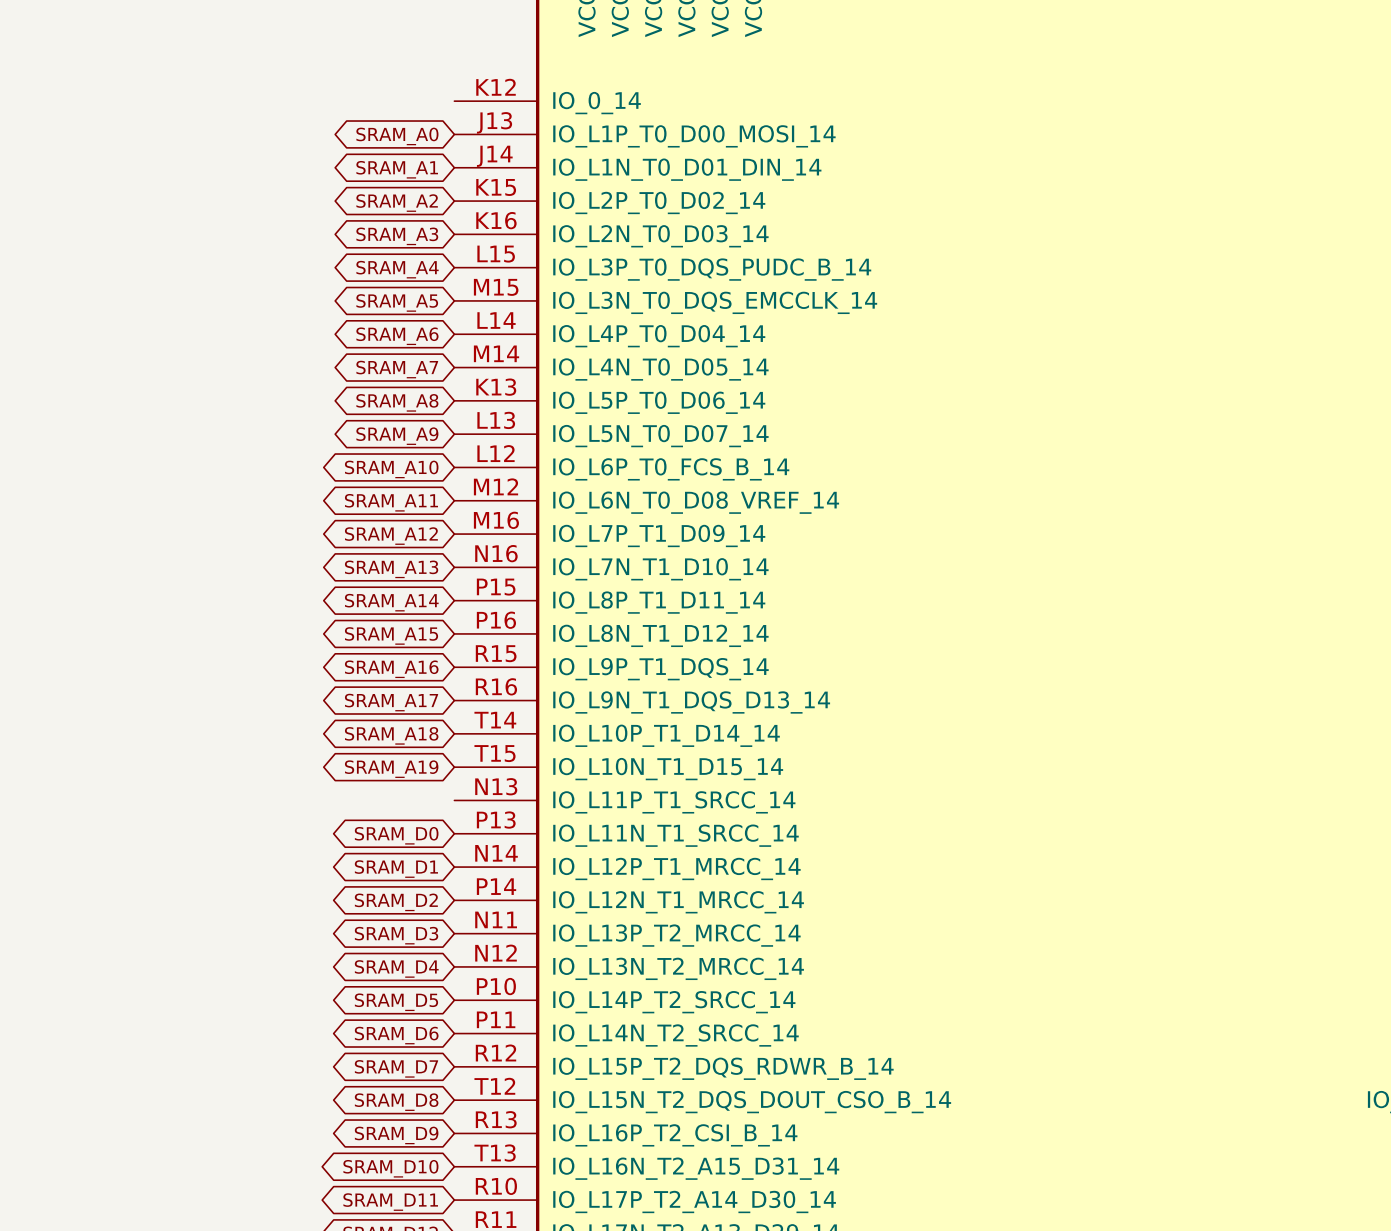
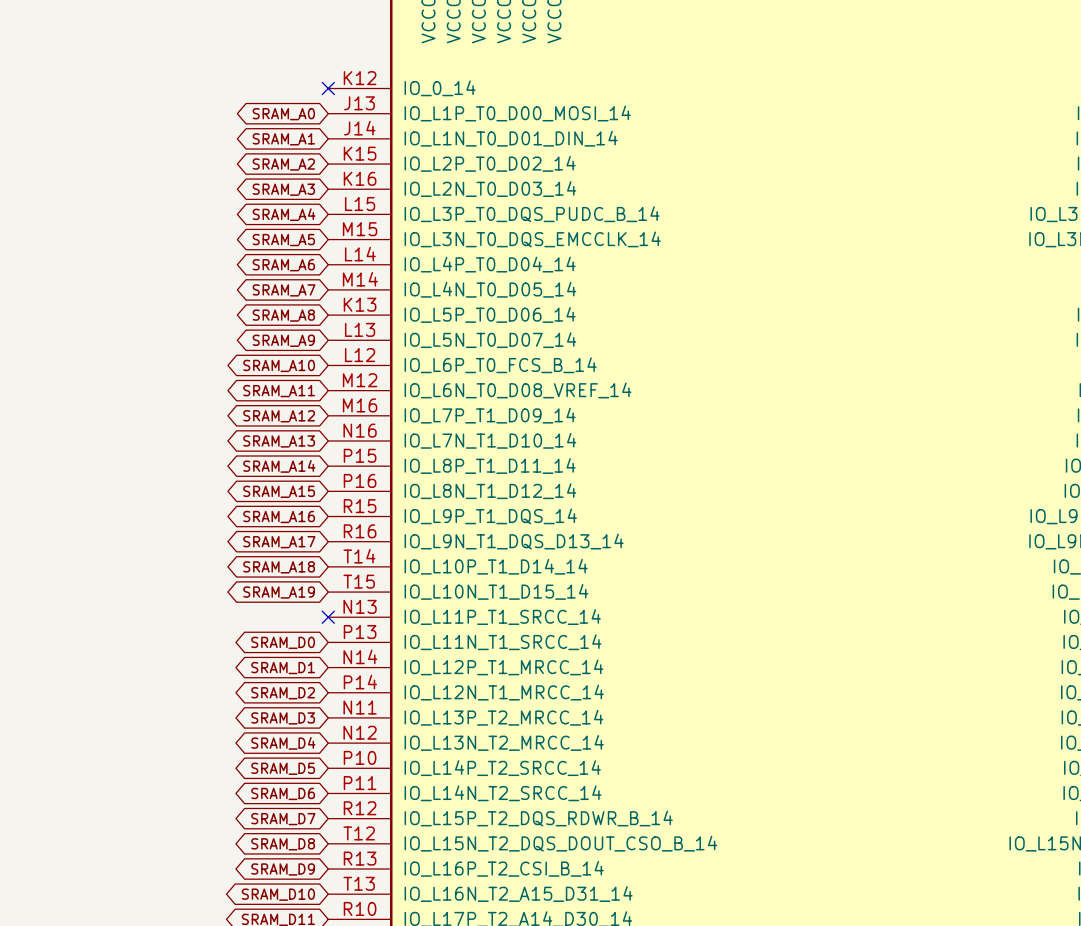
no-connect mark: none -> (328, 88)
no-connect mark: none -> (328, 617)

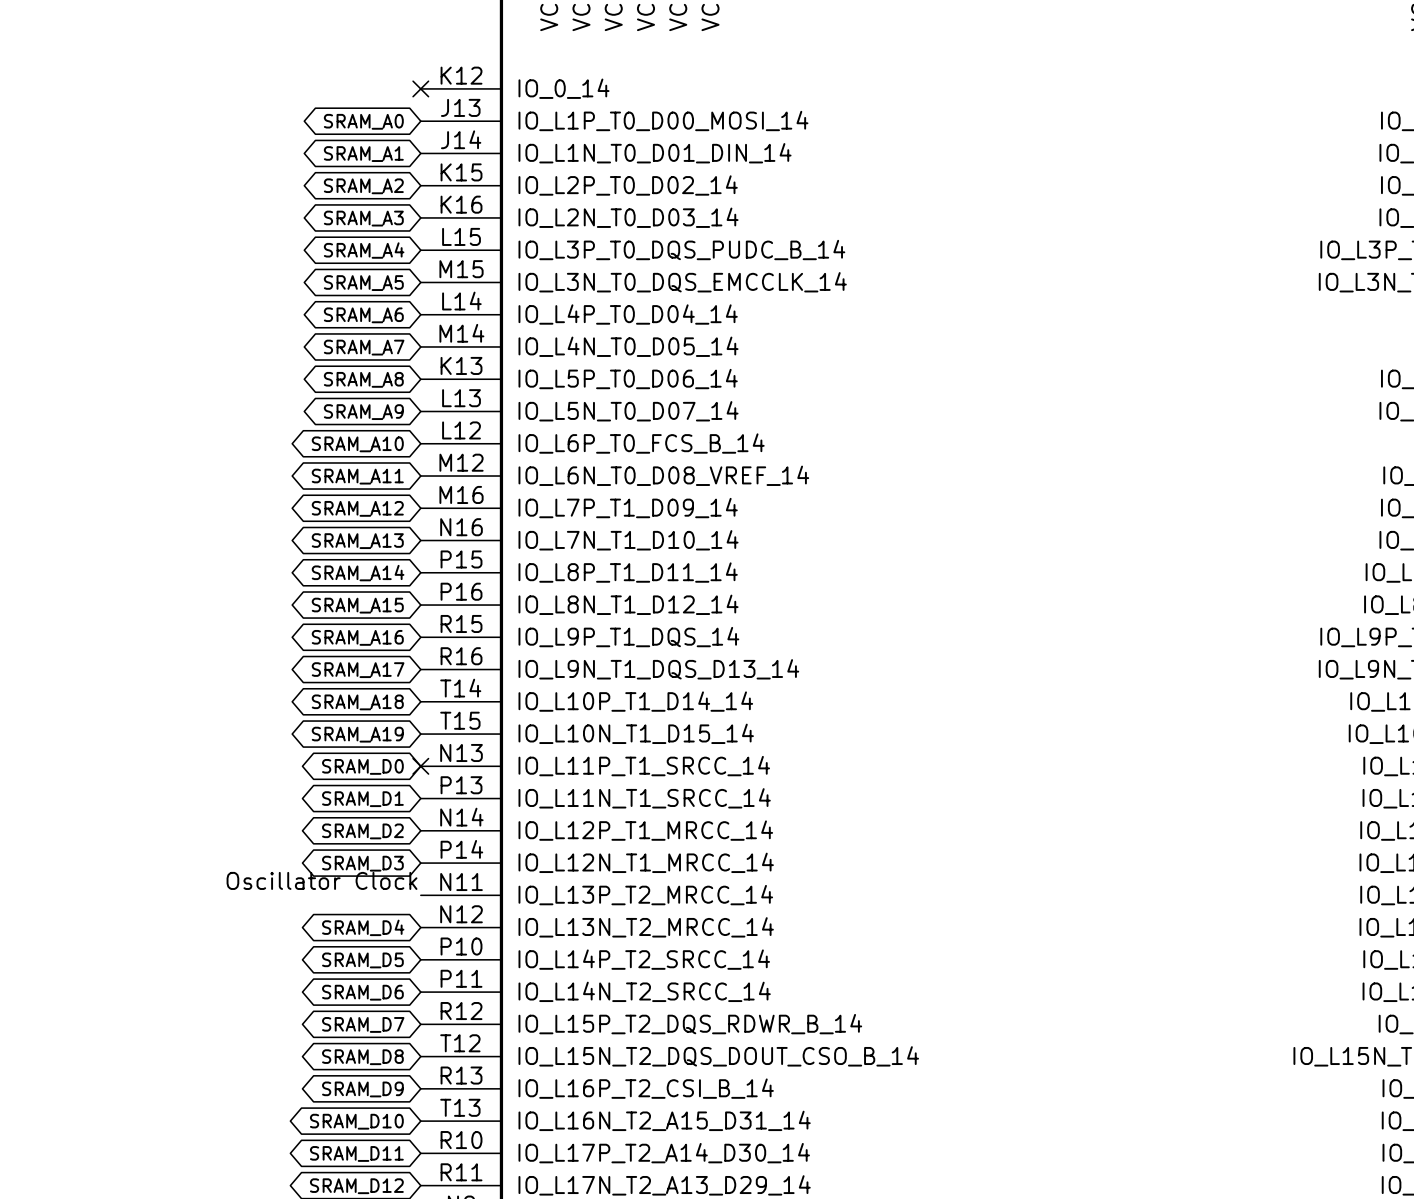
global label: none -> SRAM_D0 (362, 766)
global label: SRAM_D0 (283, 642) -> SRAM_D1 (362, 799)
global label: SRAM_D1 (283, 668) -> SRAM_D2 (362, 831)
global label: SRAM_D2 (283, 693) -> SRAM_D3 (362, 863)
label: none -> Oscillator Clock (322, 880)
global label: SRAM_D3 (283, 718) -> none

